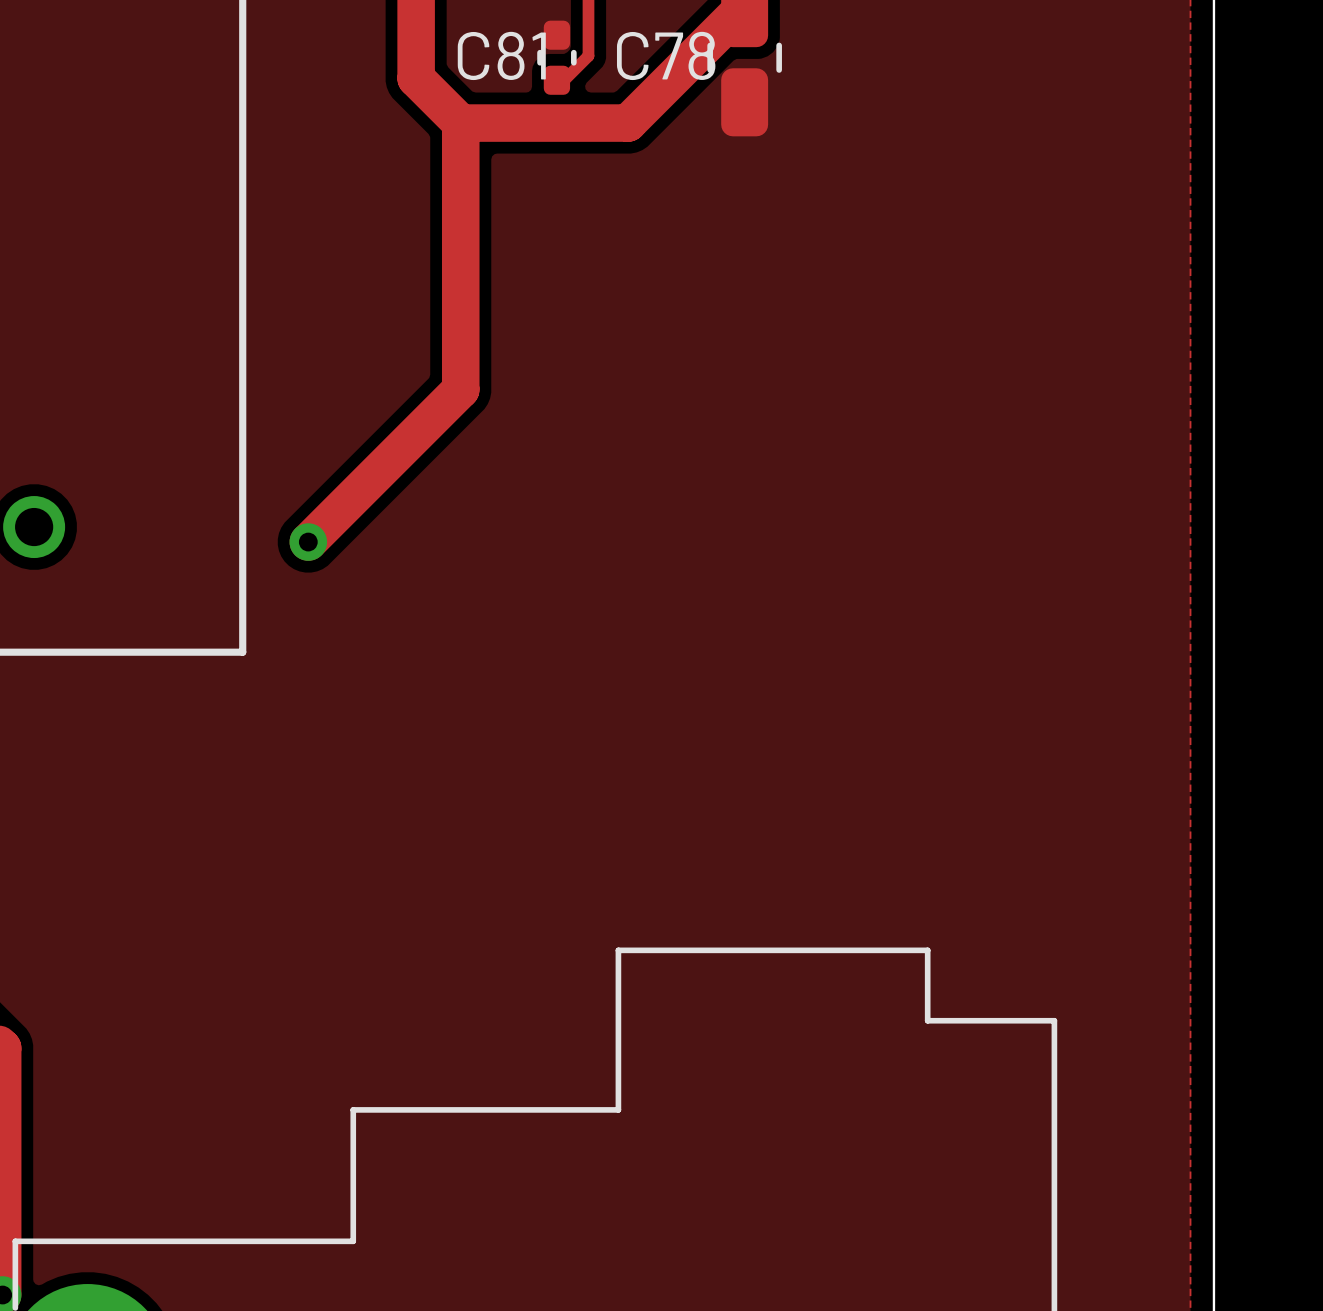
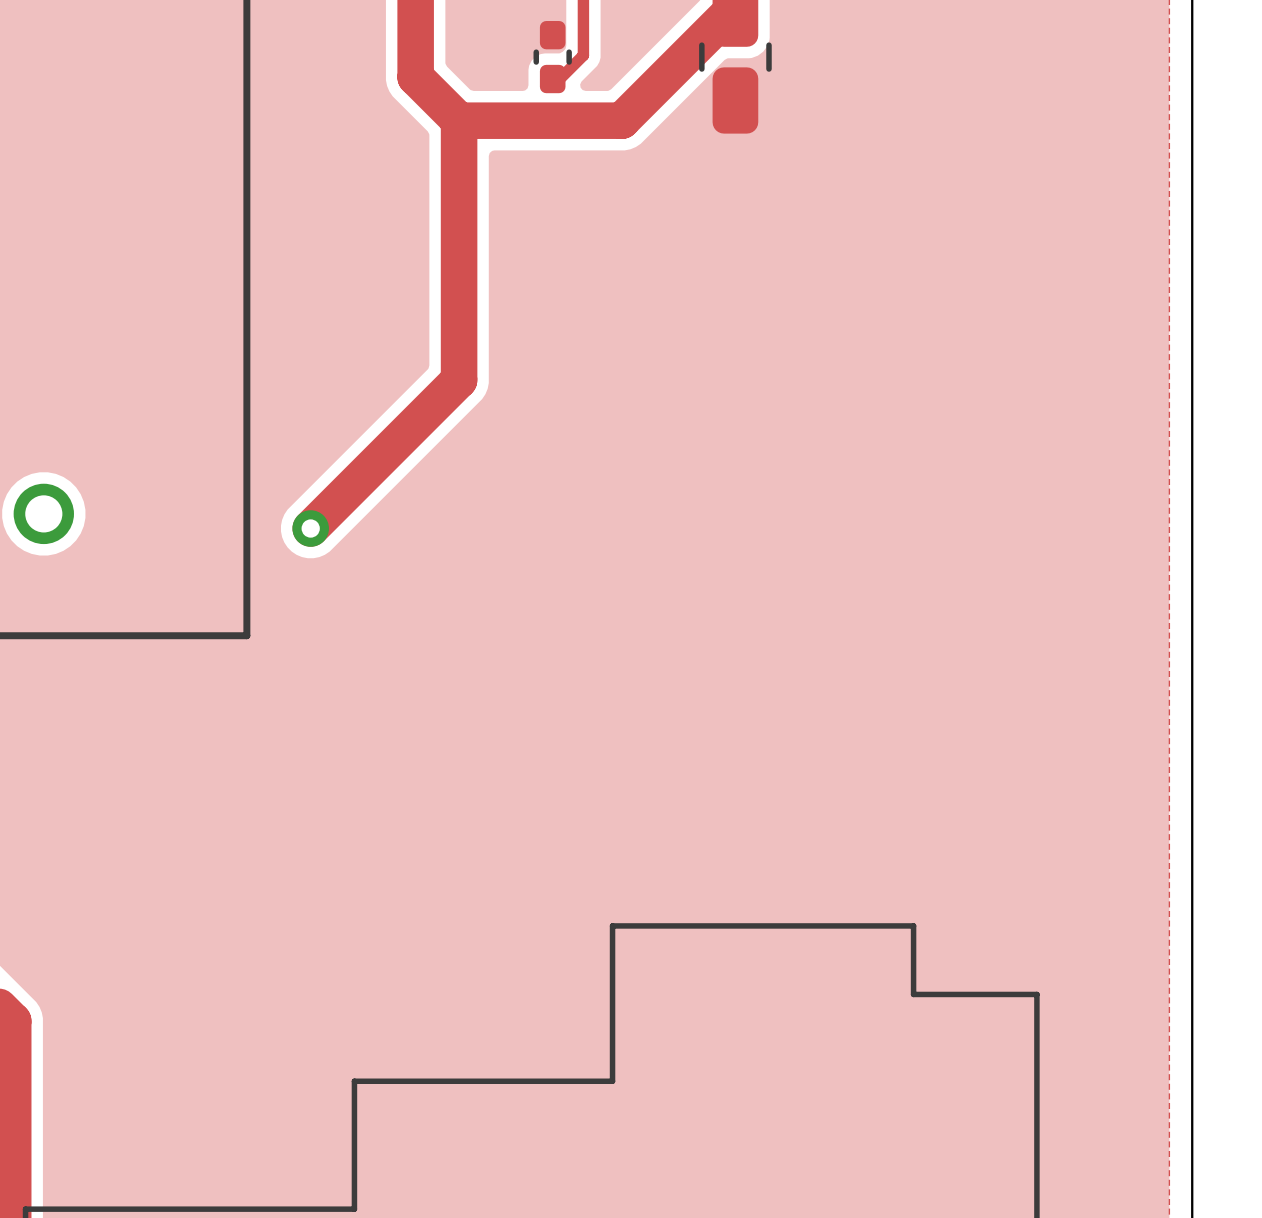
C81 name: C81 (501, 55) -> none
C78 name: C78 (666, 55) -> none

